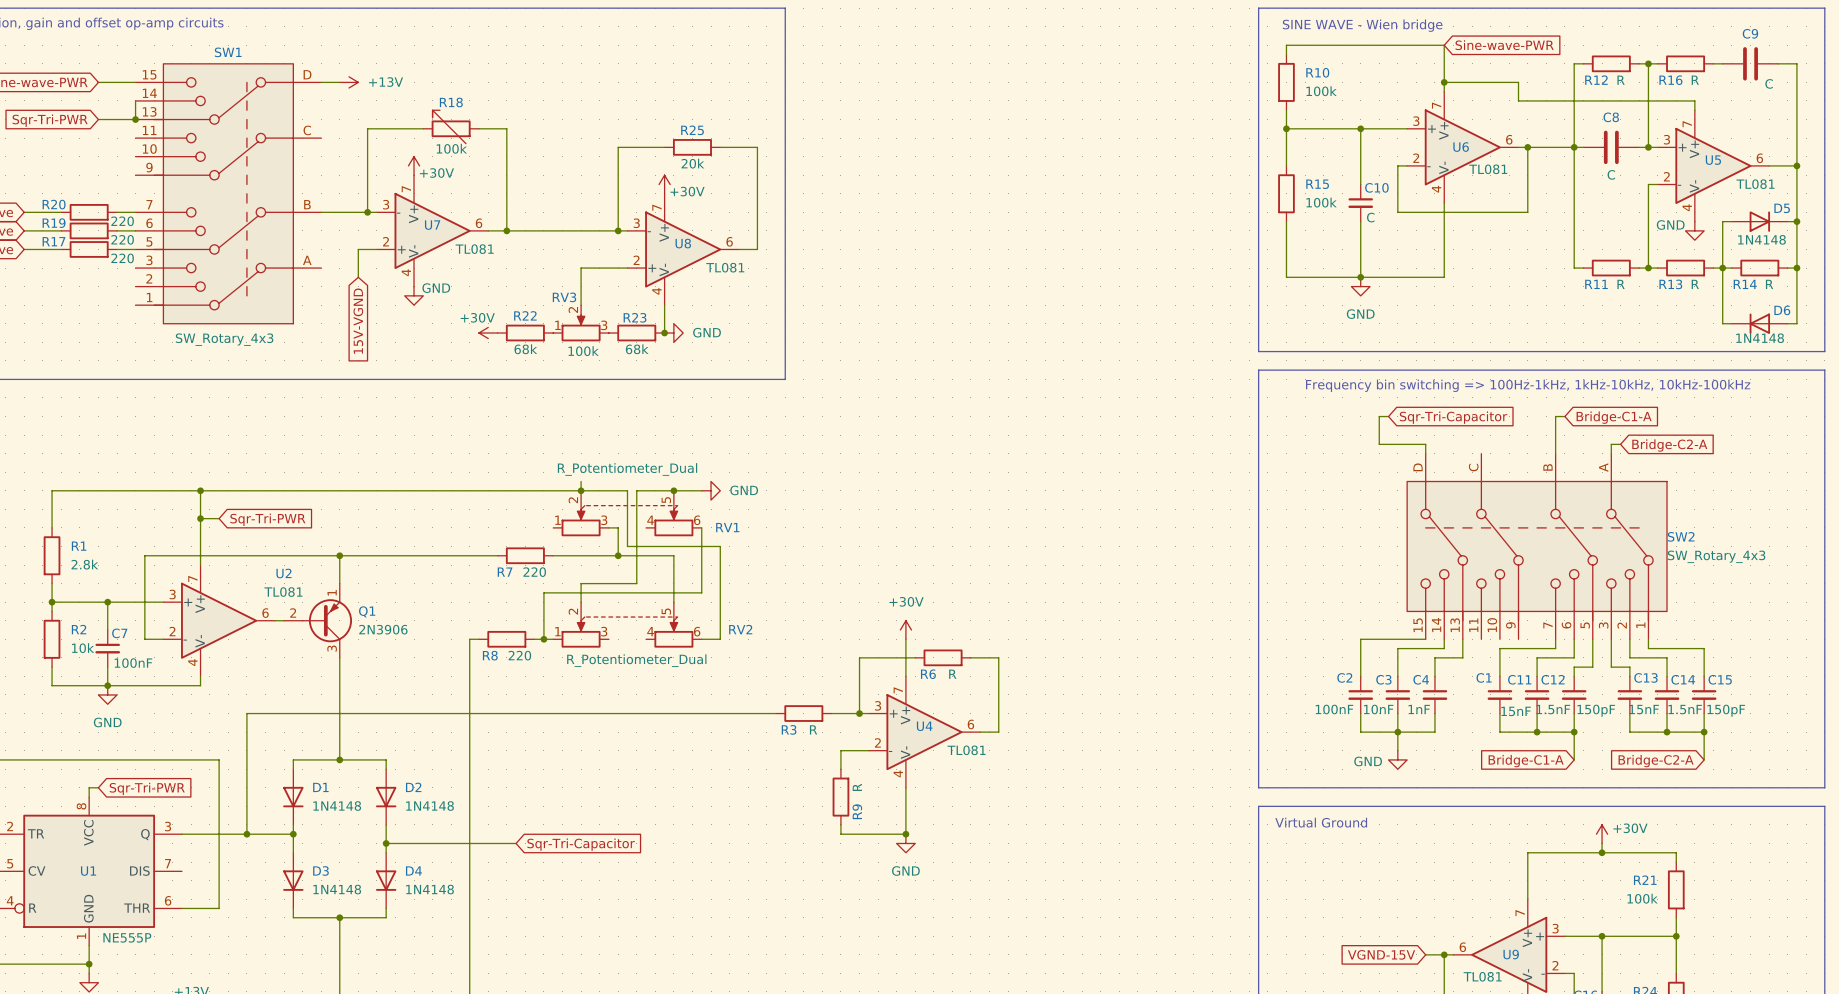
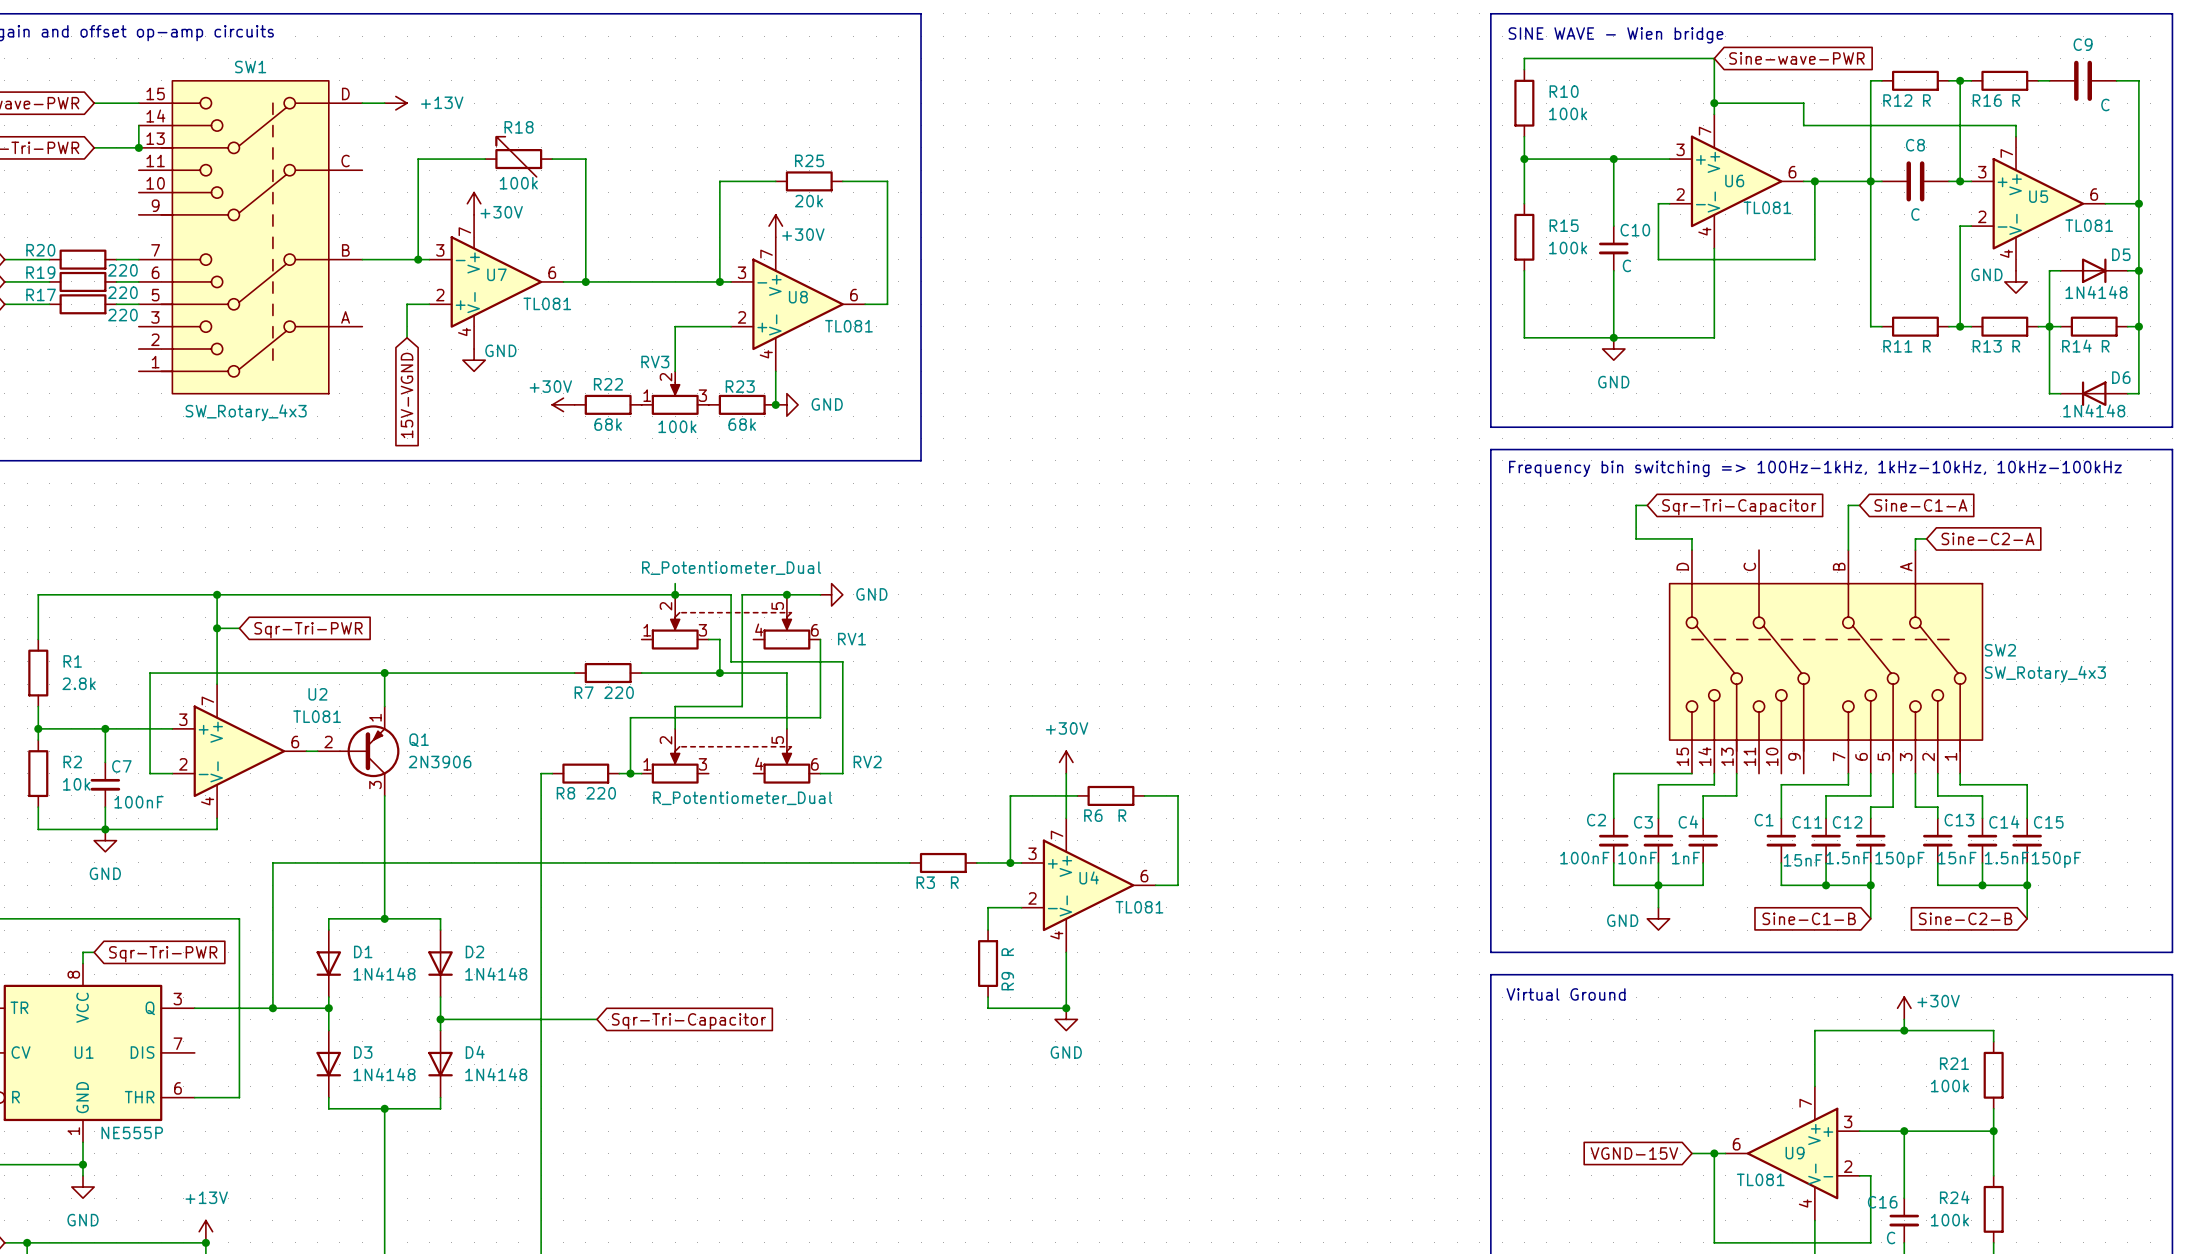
global label: Bridge-C1-A (1614, 417) -> Sine-C1-A (1920, 505)
global label: Bridge-C2-A (1669, 445) -> Sine-C2-A (1987, 538)
global label: Bridge-C1-A (1526, 761) -> Sine-C1-B (1809, 918)
global label: Bridge-C2-A (1656, 761) -> Sine-C2-B (1965, 918)

